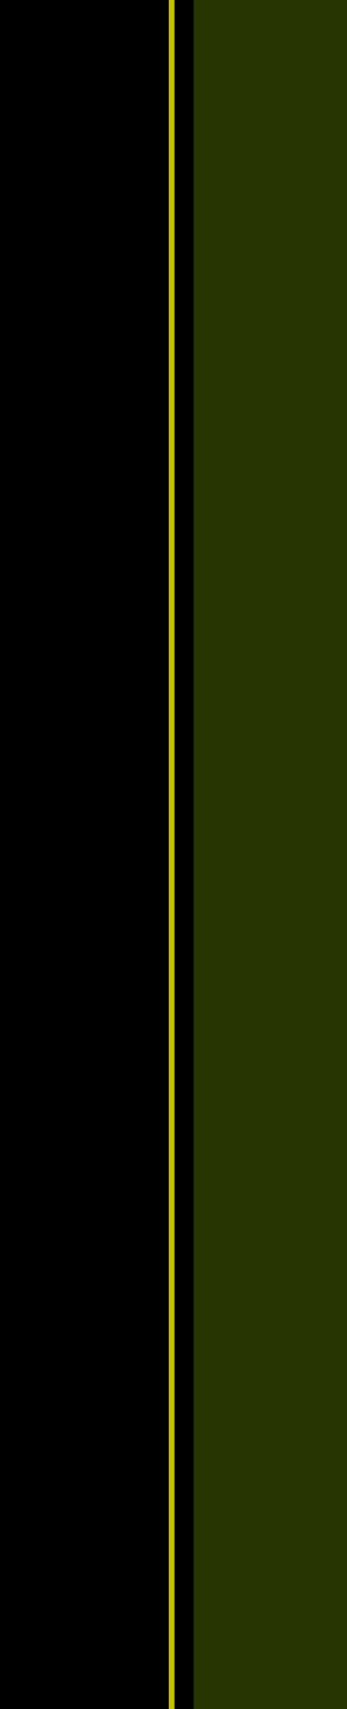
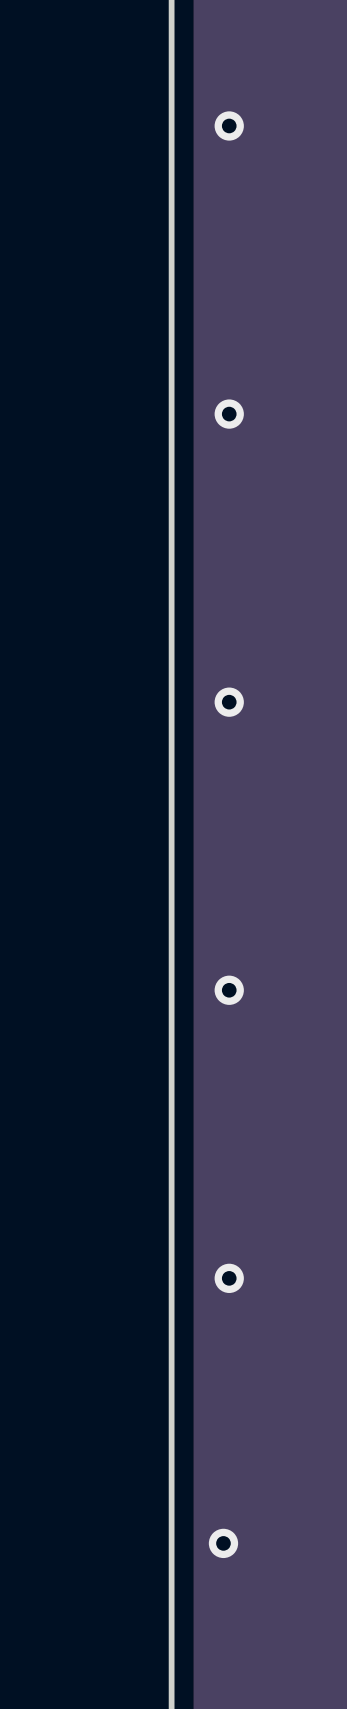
via: none -> (229, 125)
via: none -> (229, 414)
via: none -> (229, 702)
via: none -> (229, 990)
via: none -> (229, 1278)
via: none -> (223, 1543)

